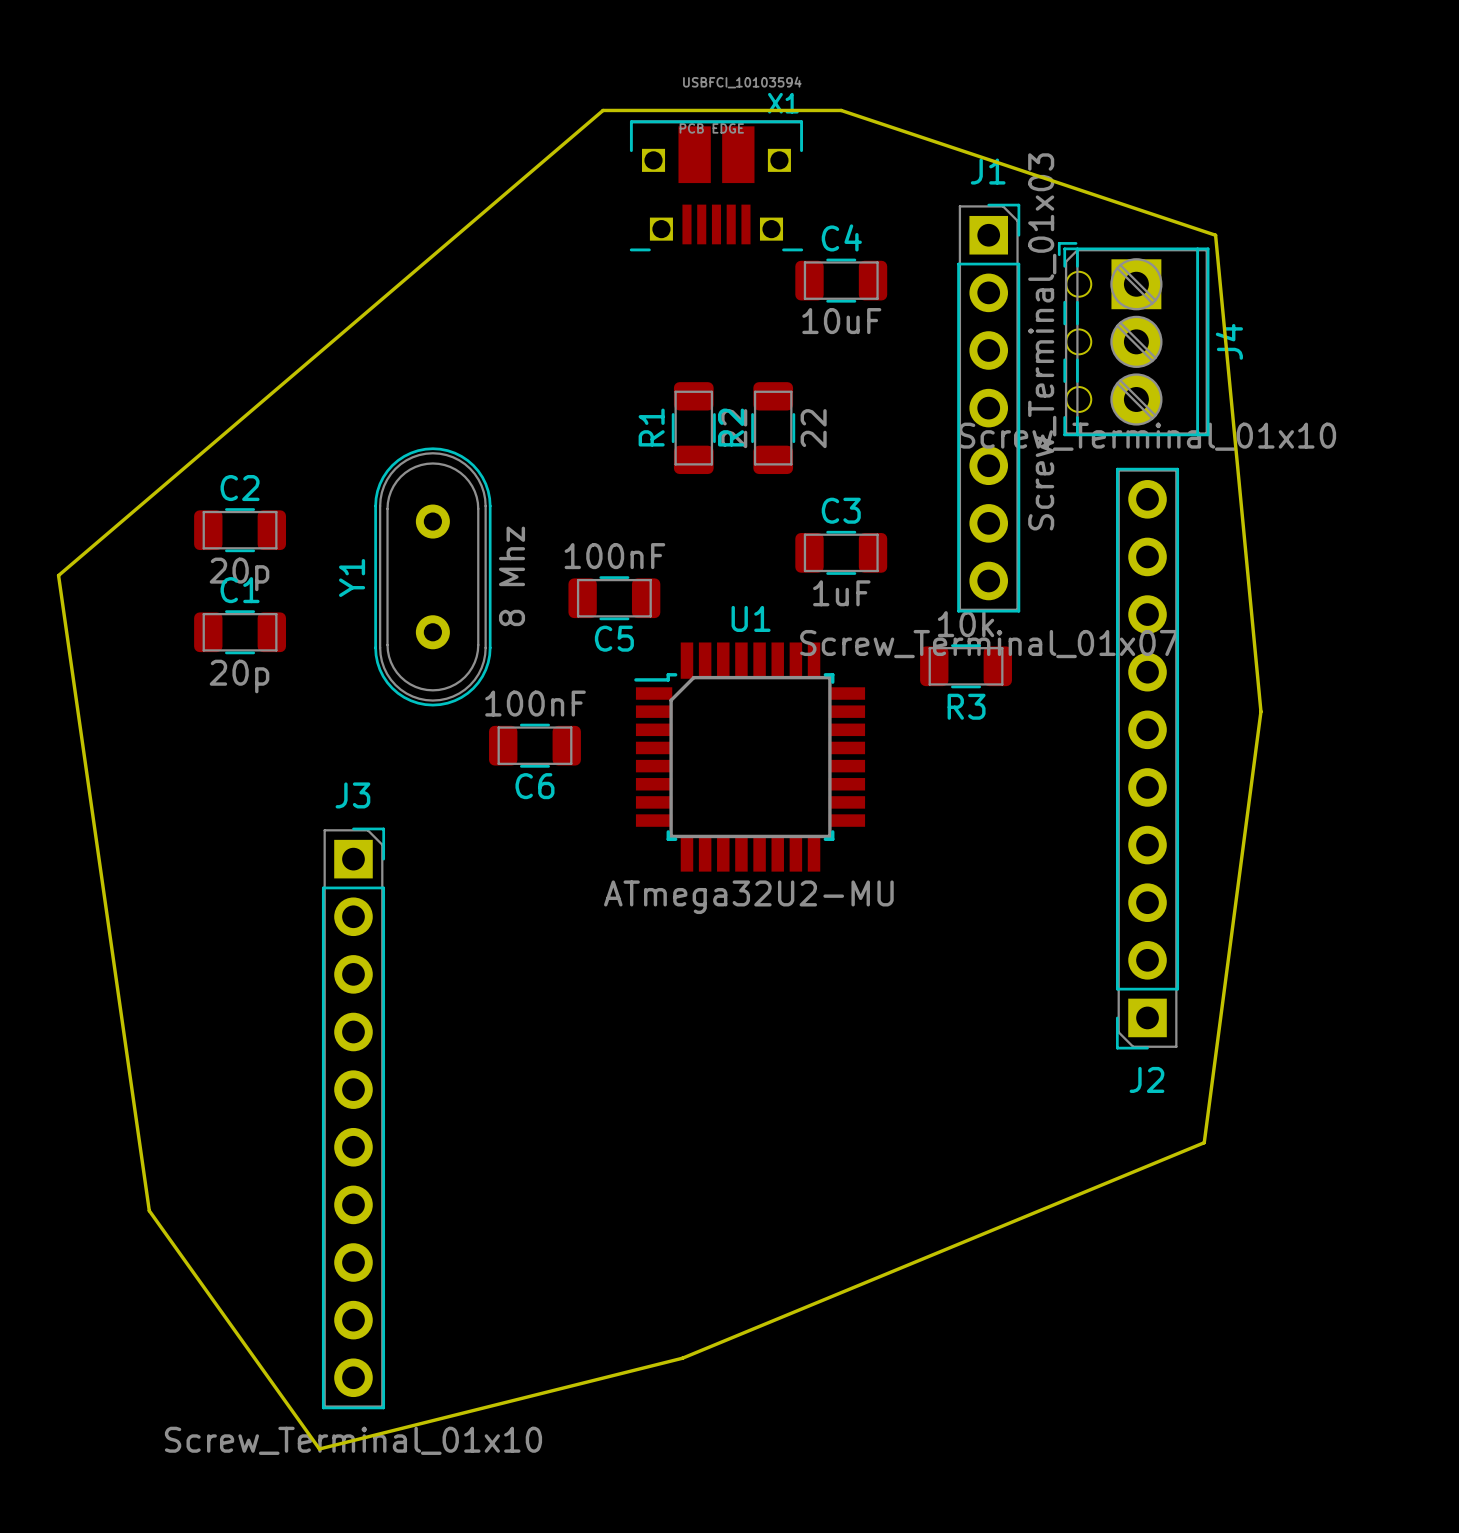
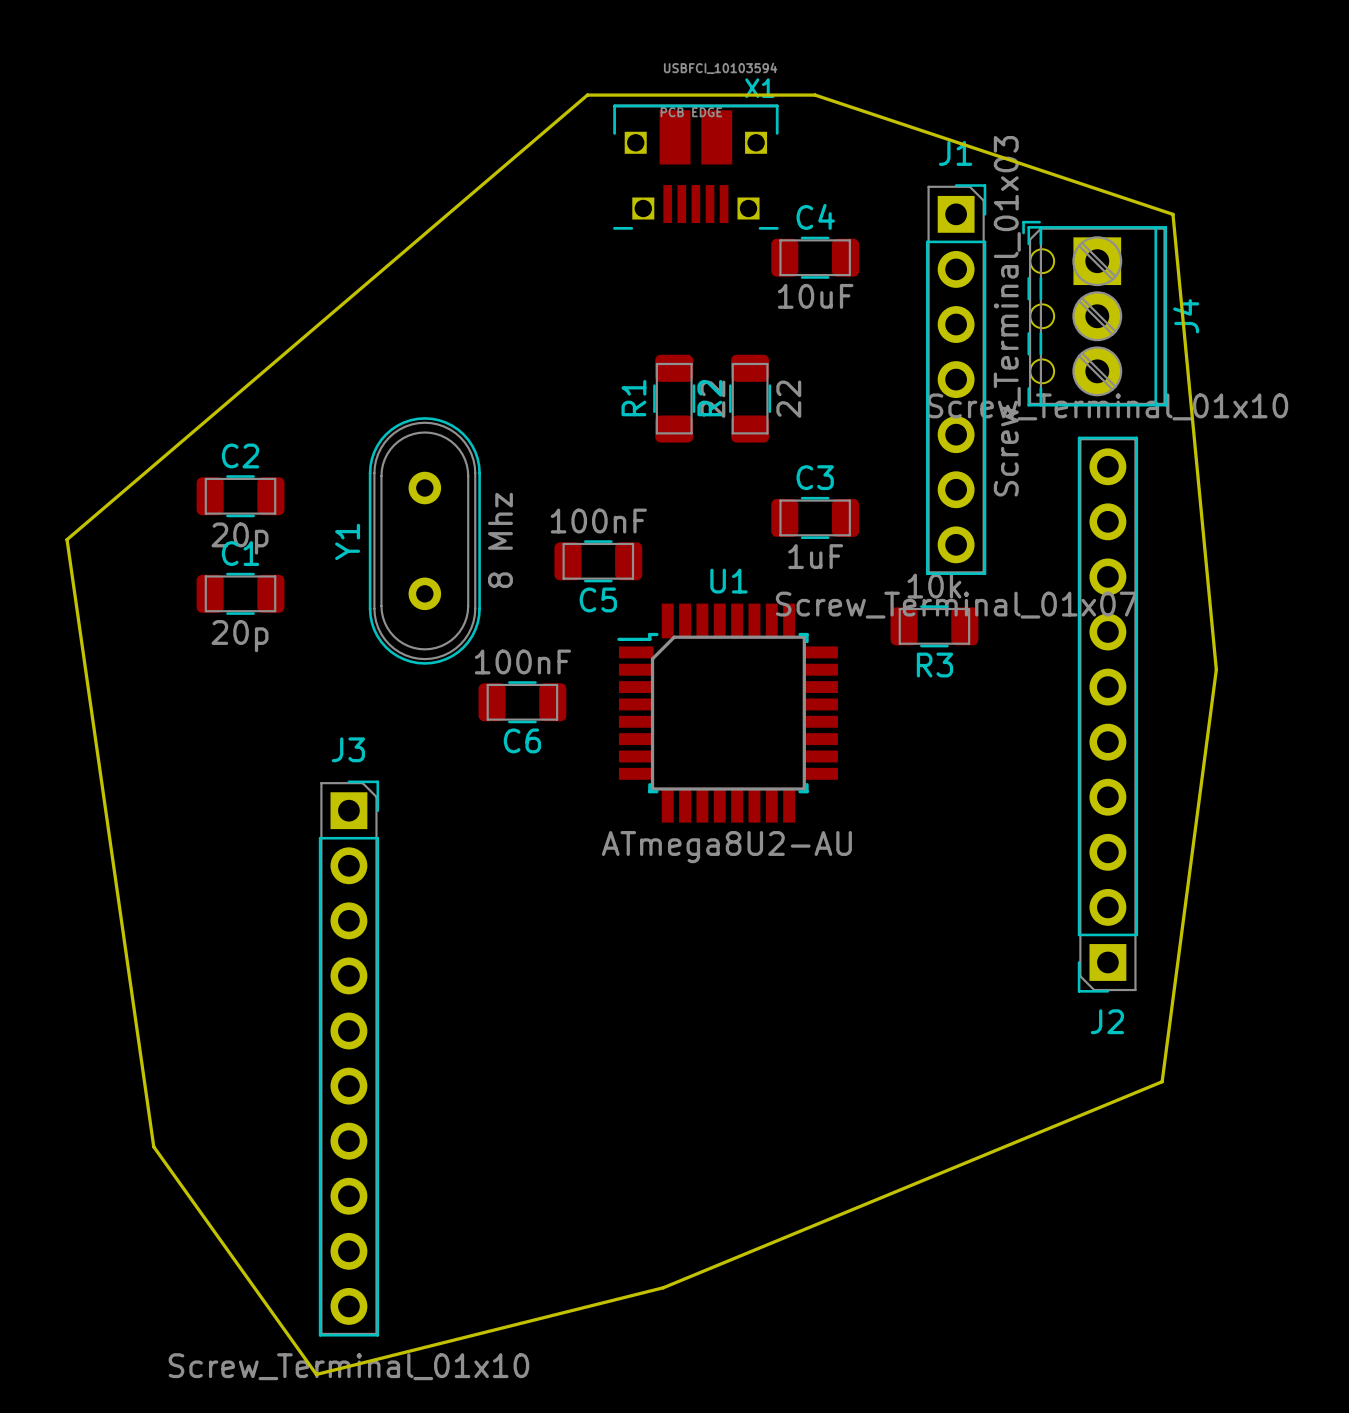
U1 value: ATmega32U2-MU (748, 897) -> ATmega8U2-AU (726, 847)

